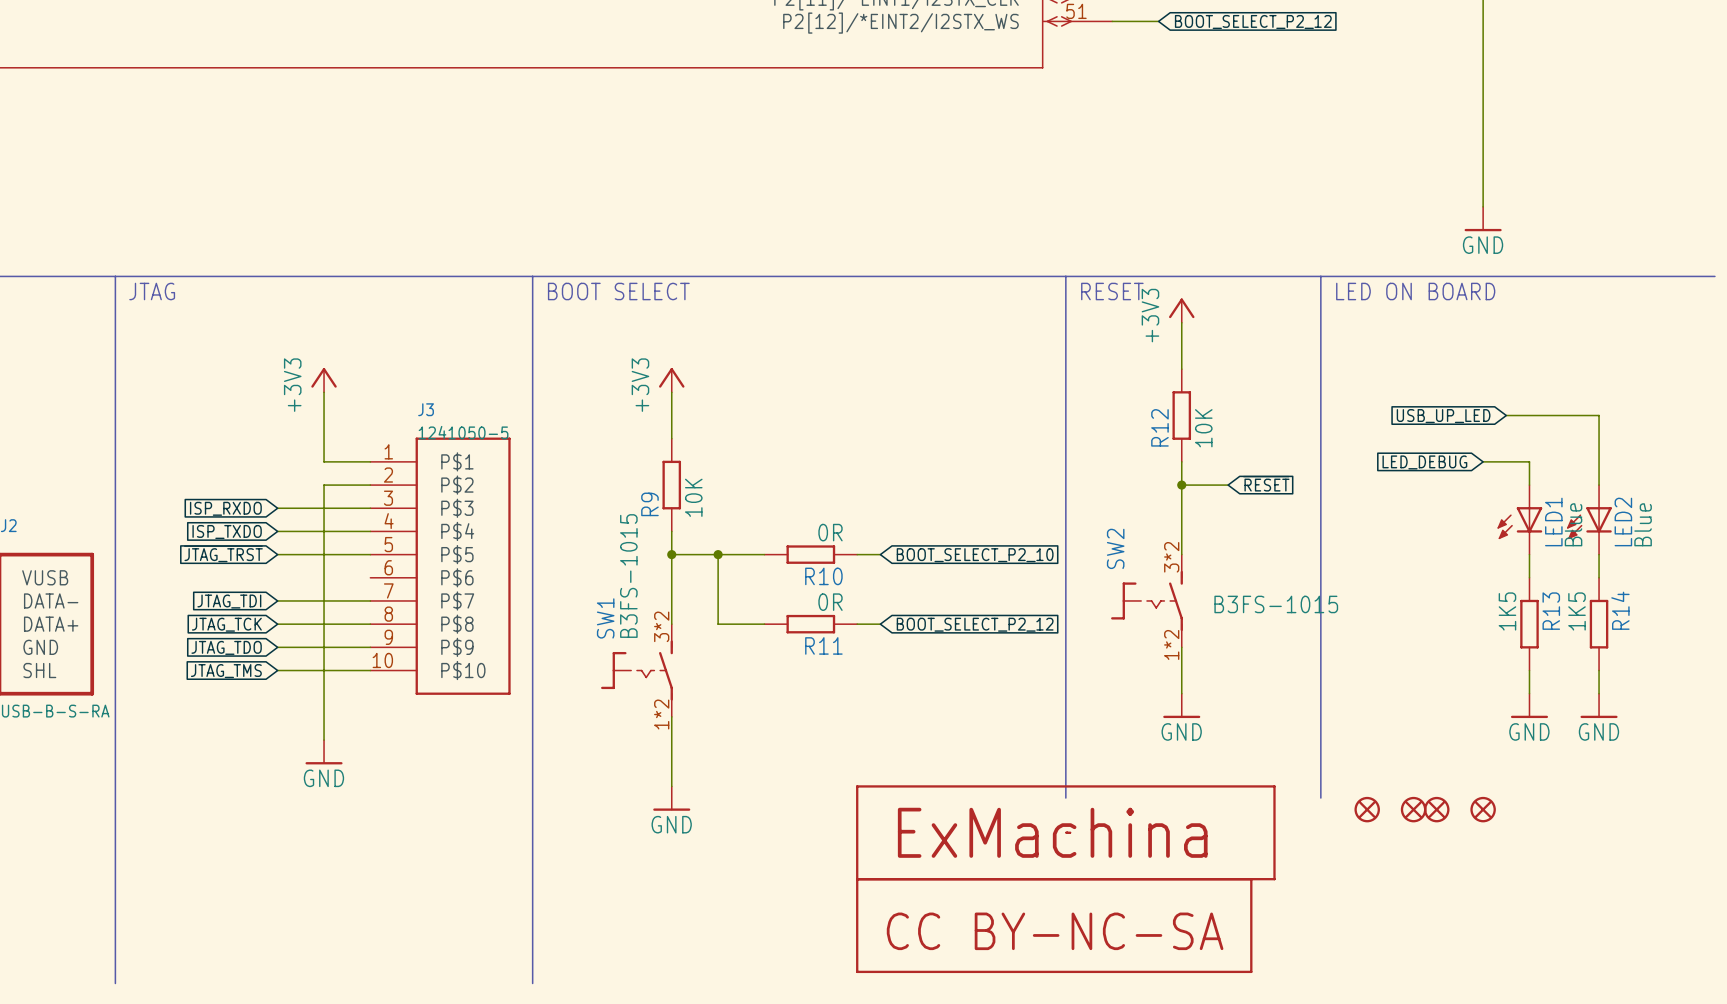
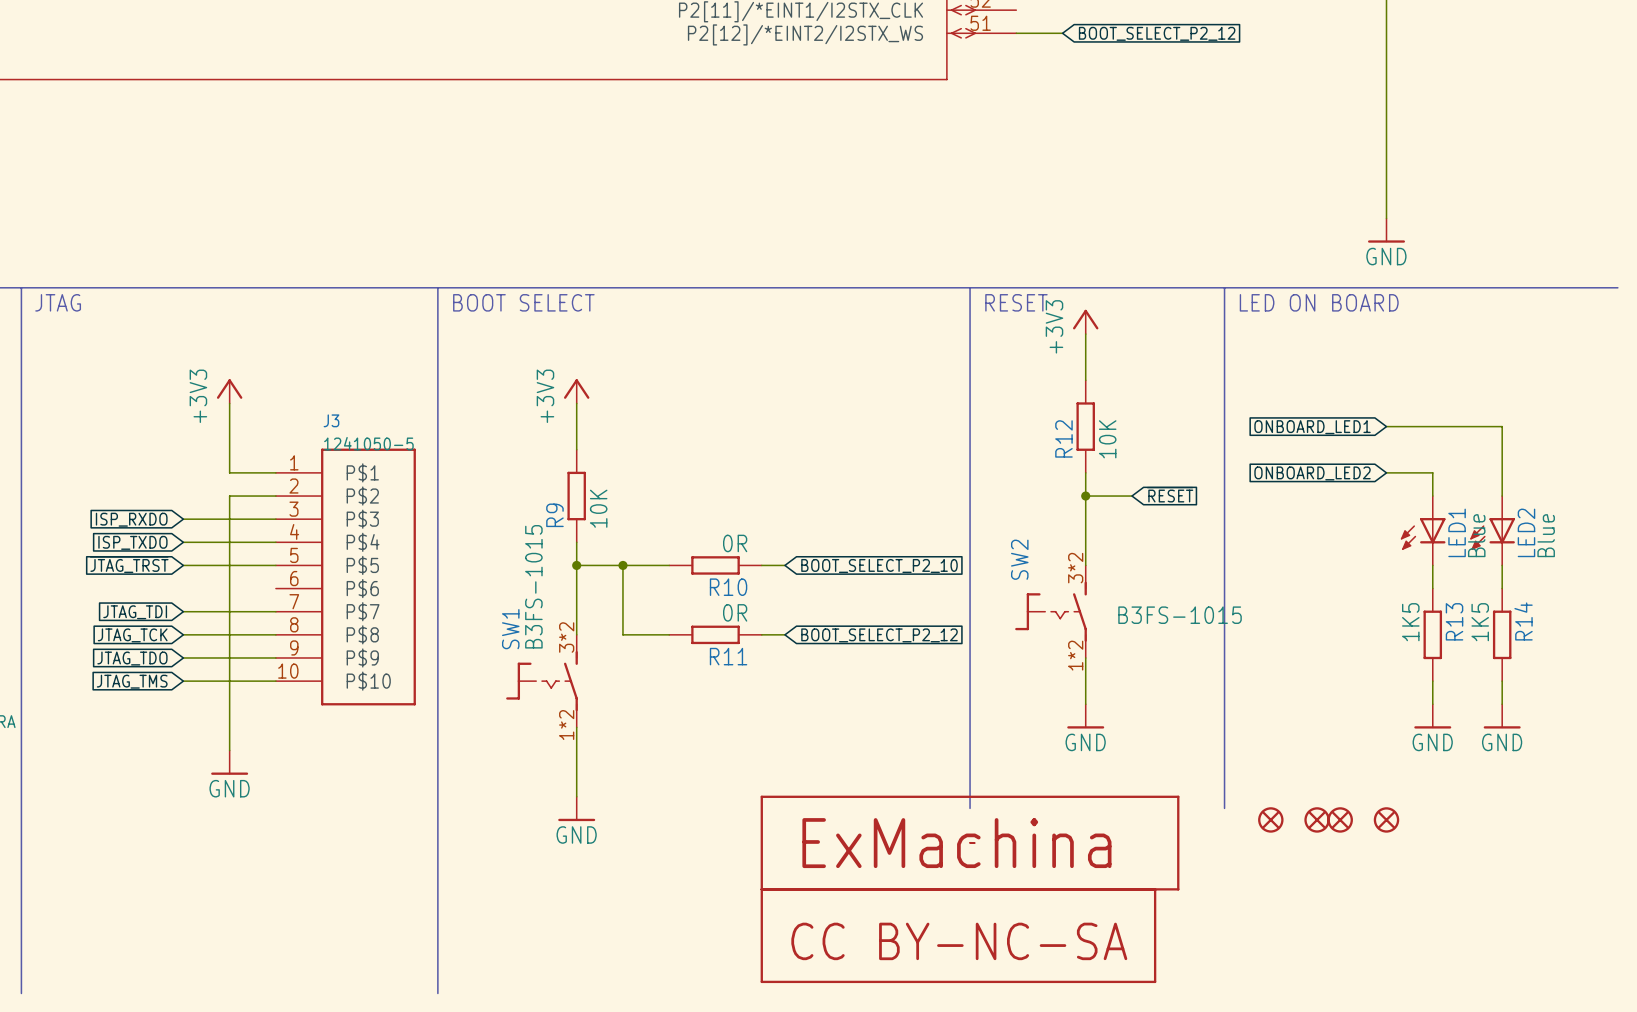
wire: none -> (1386, 426) (1409, 426)
global label: none -> ONBOARD_LED1 (1312, 427)
global label: USB_UP_LED (1443, 416) -> none
global label: LED_DEBUG (1424, 462) -> ONBOARD_LED2 (1312, 473)

